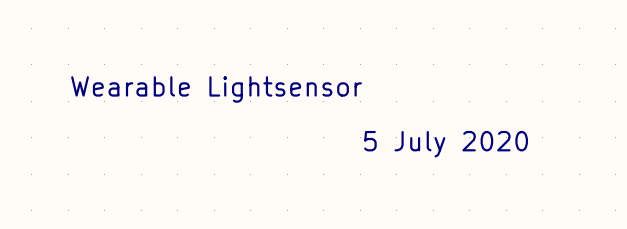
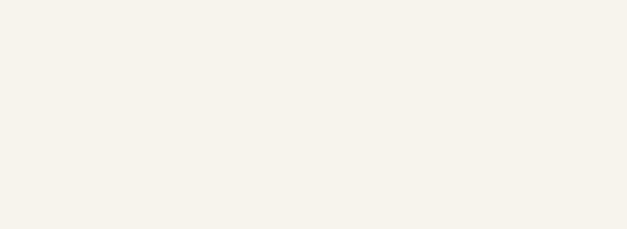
text: Wearable Lightsensor (216, 89) -> none
text: 5 July 2020 (446, 144) -> none

